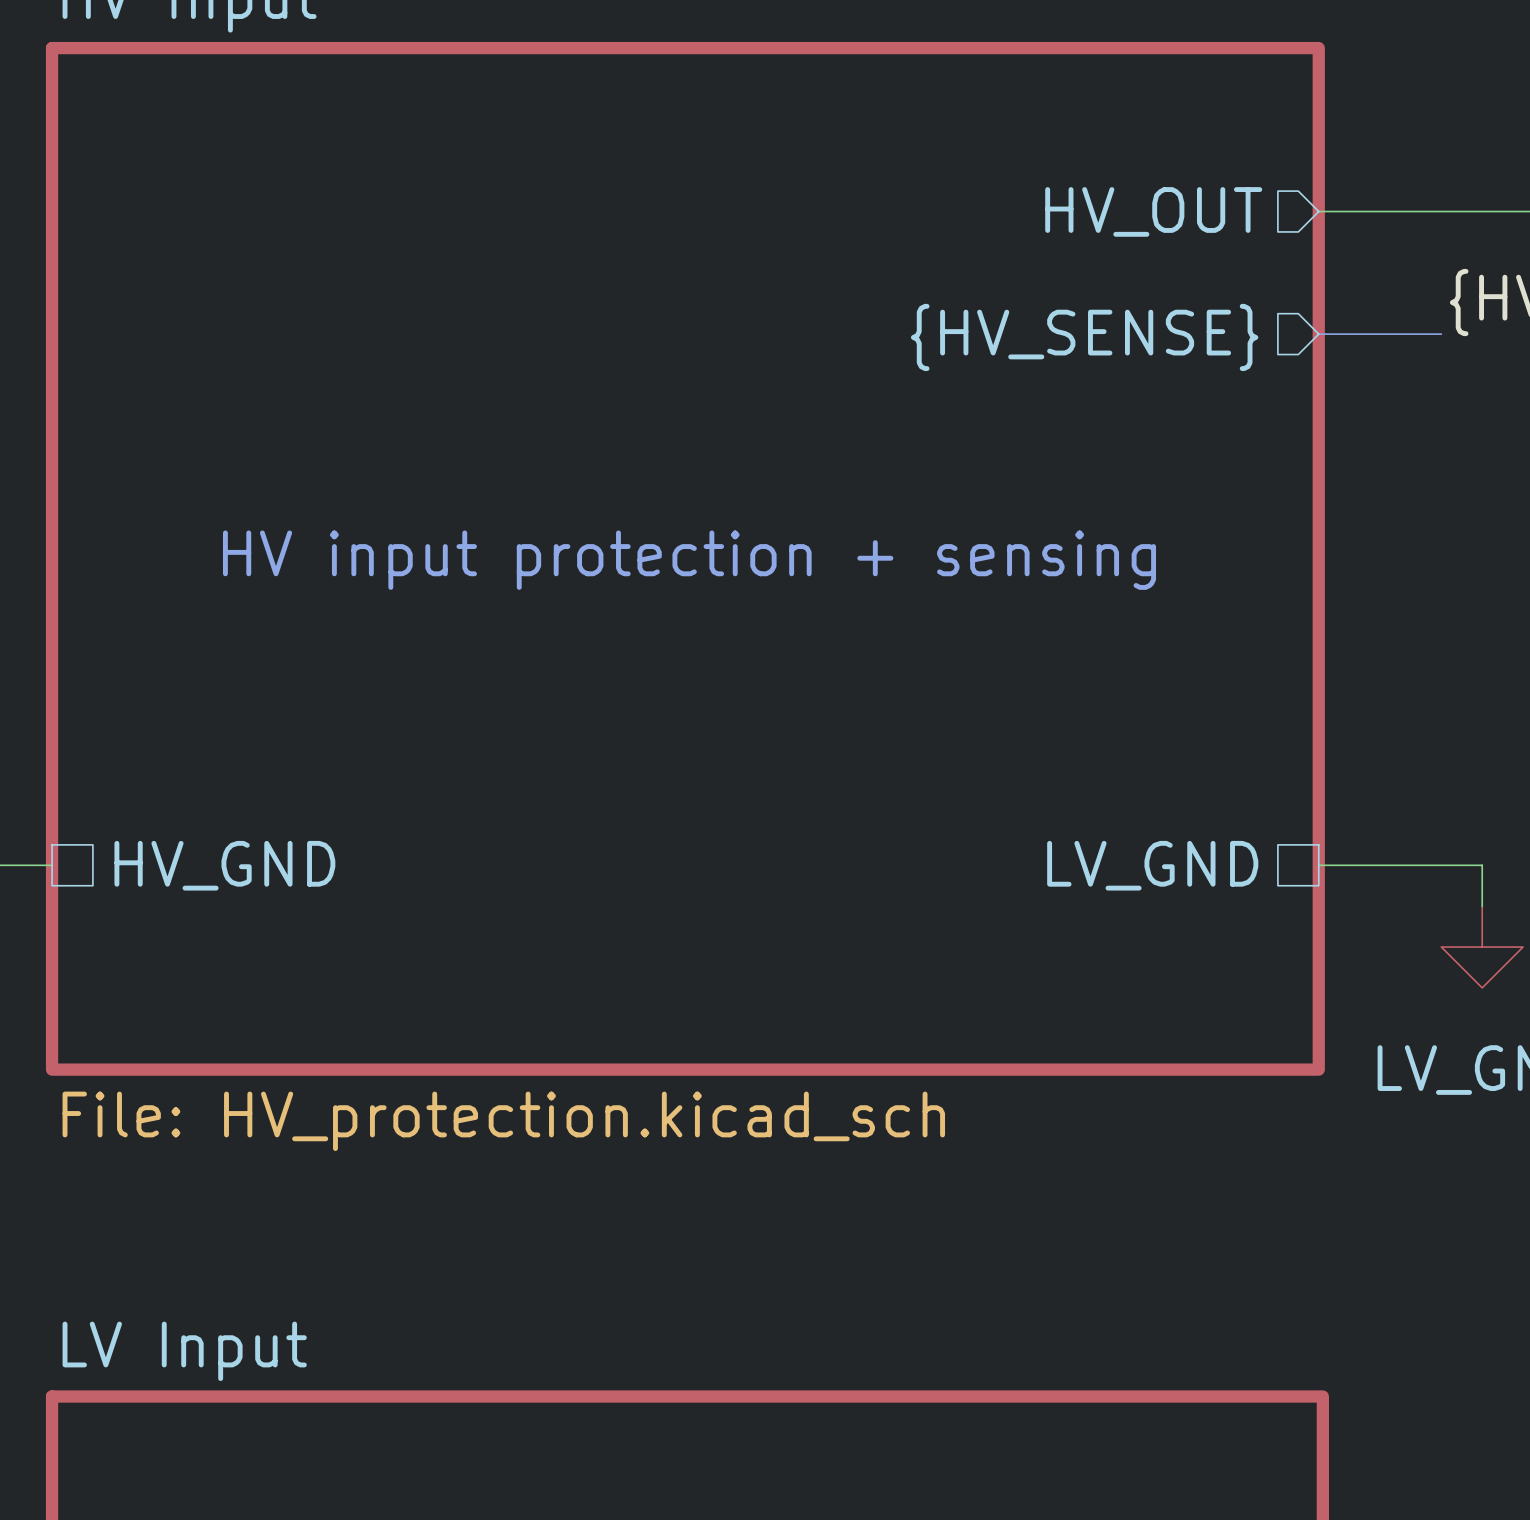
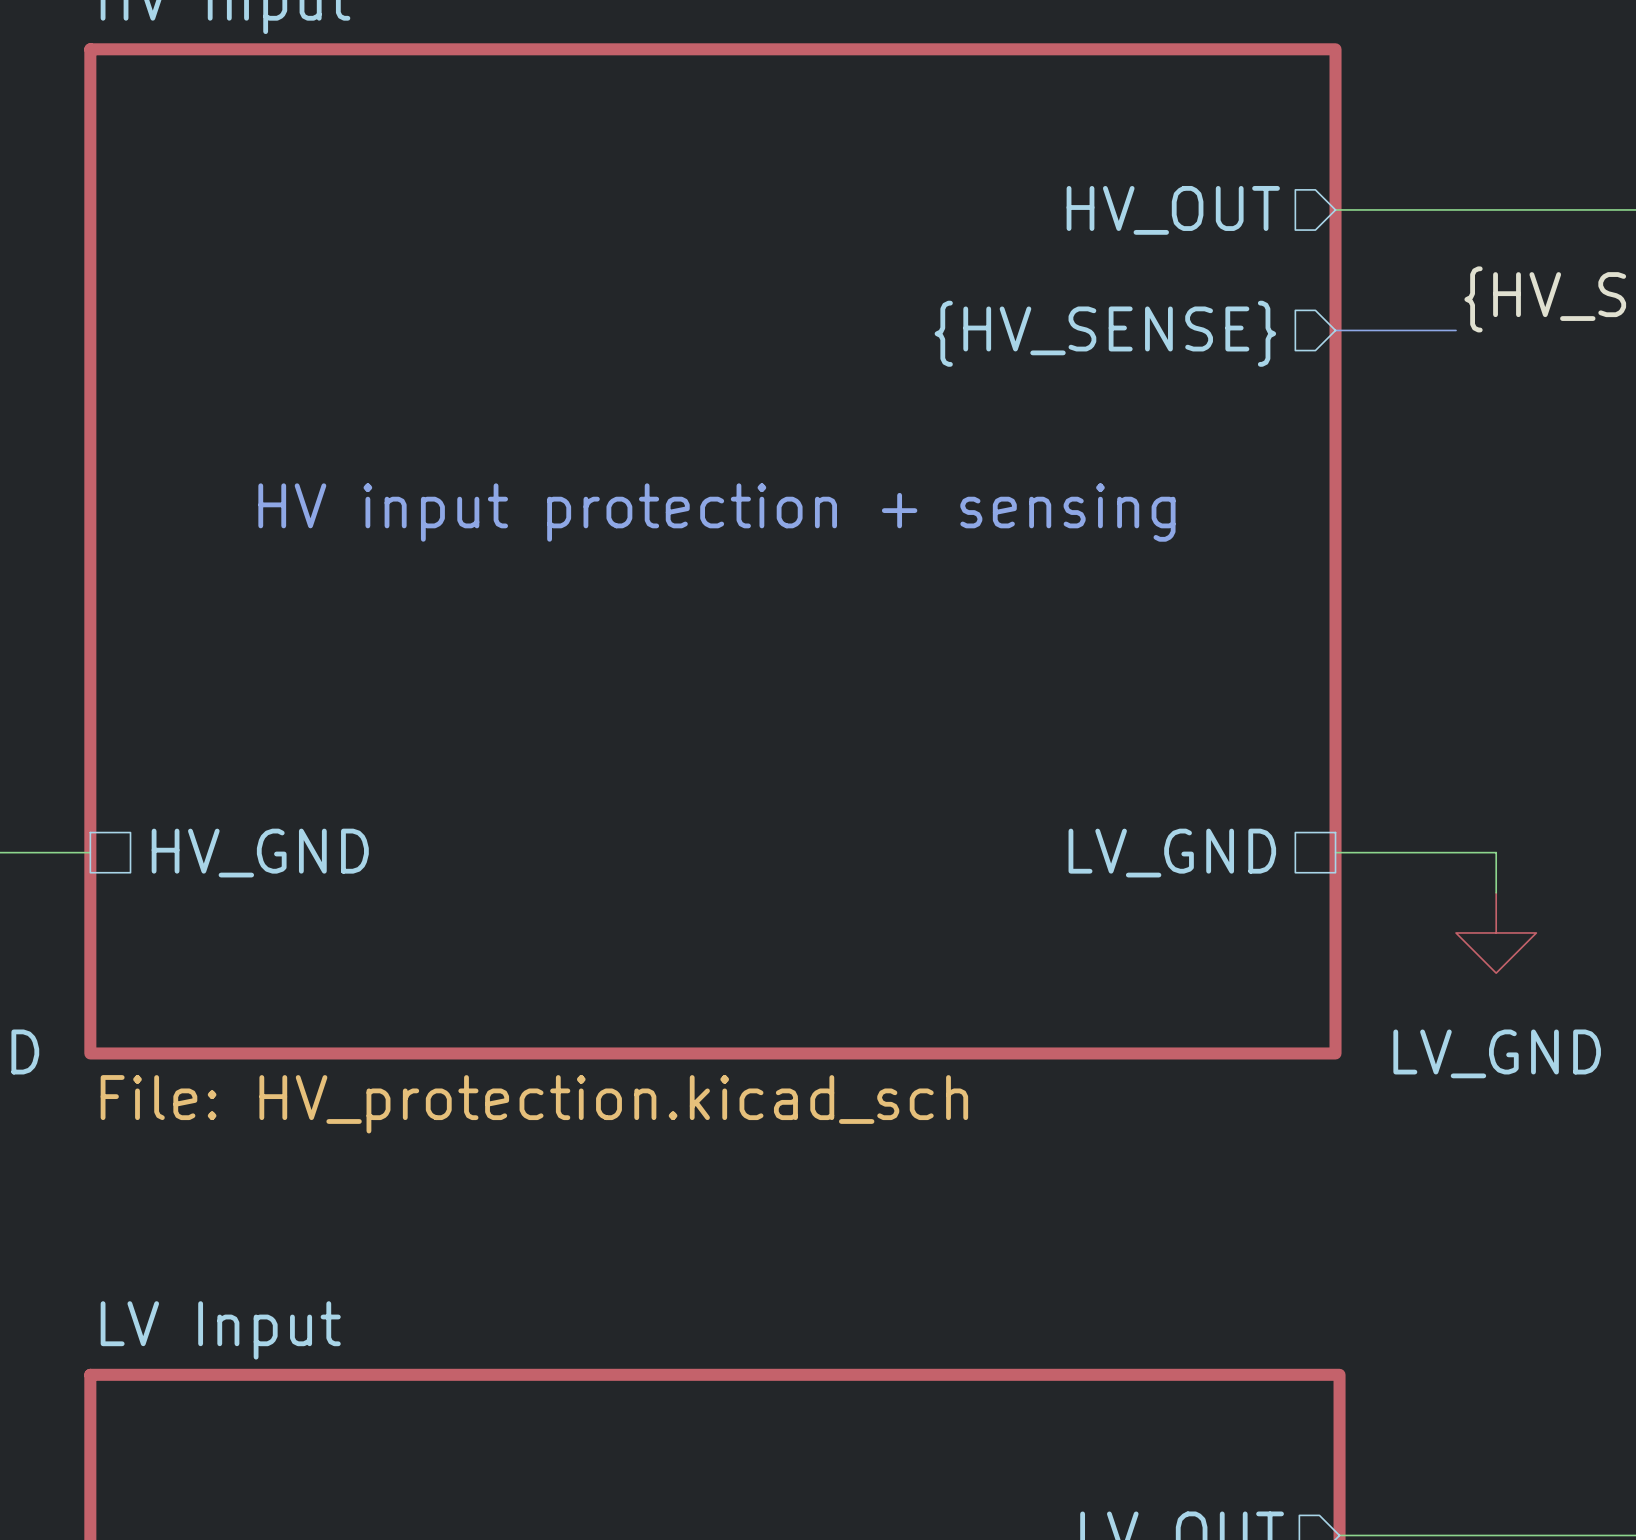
text position: HV input protection + sensing (689, 560) -> HV input protection + sensing (716, 512)

